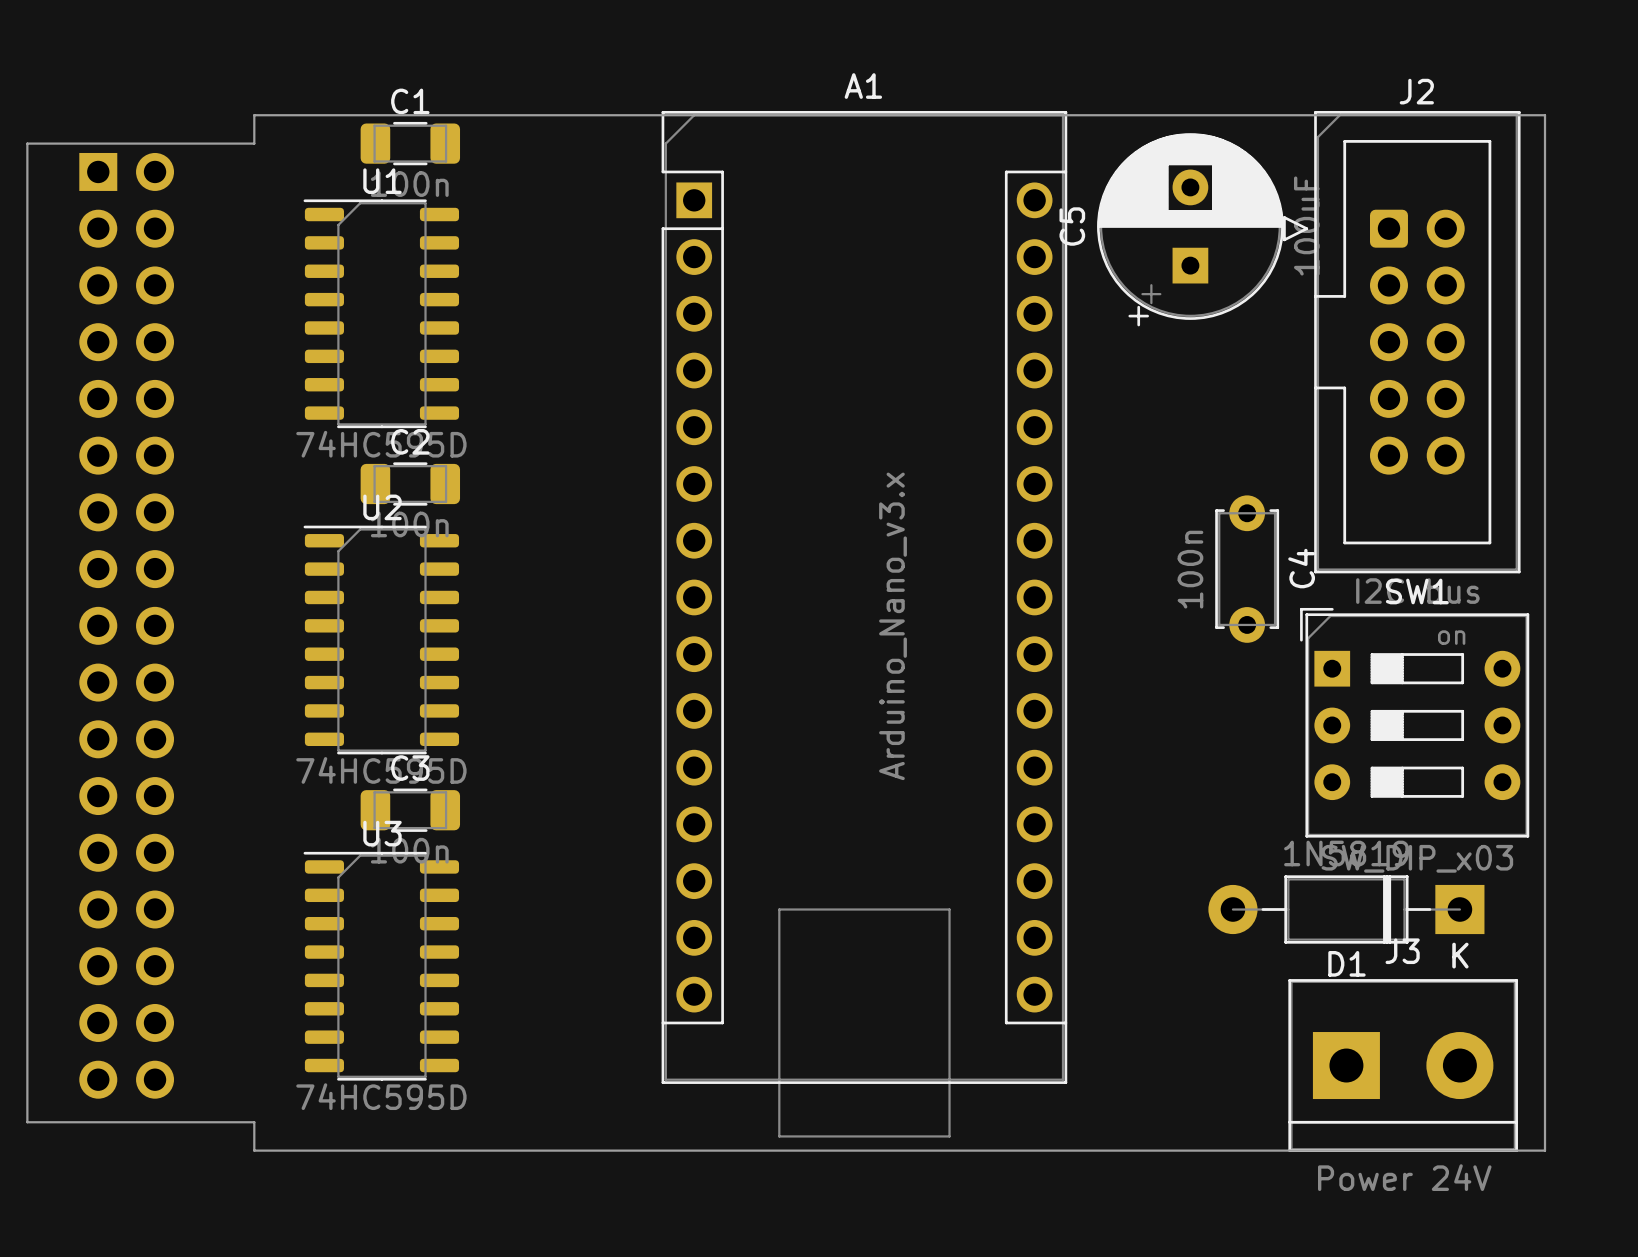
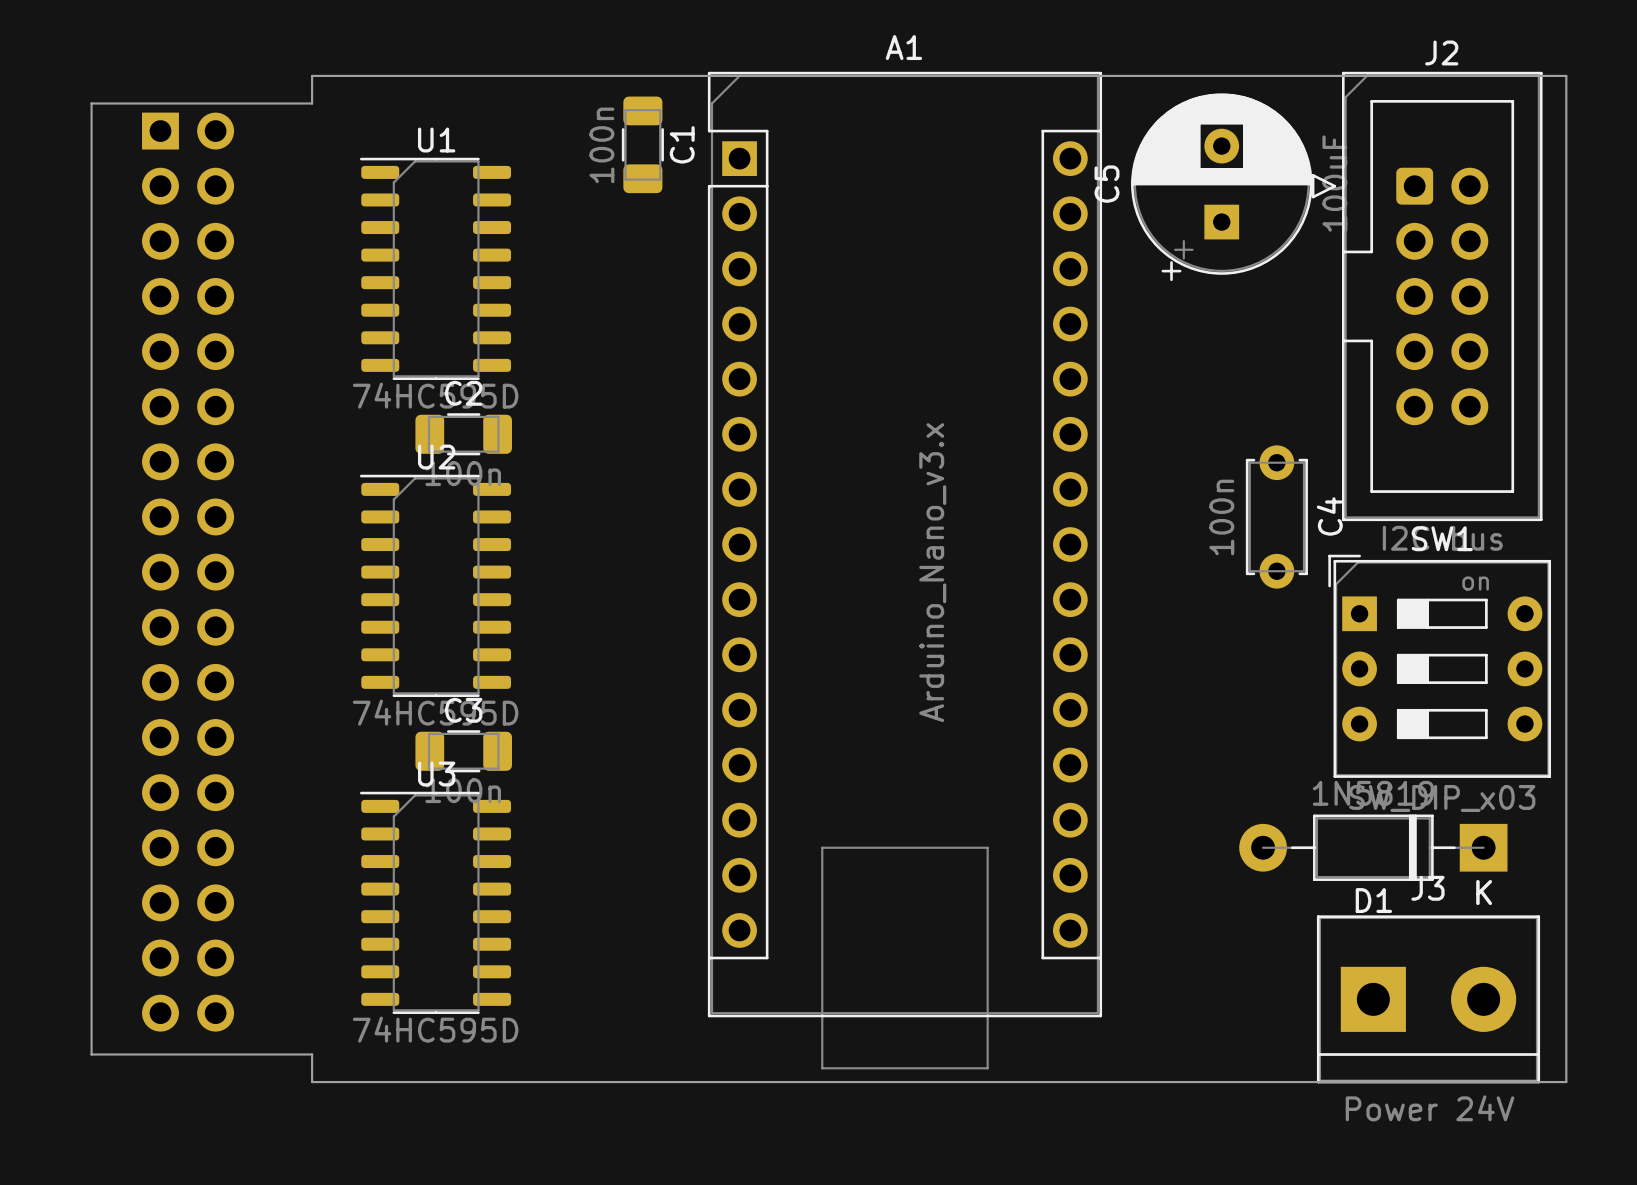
C1 rotation: 0° (410, 143) -> 90° clockwise (642, 144)
C1 position: (410, 143) -> (642, 144)

